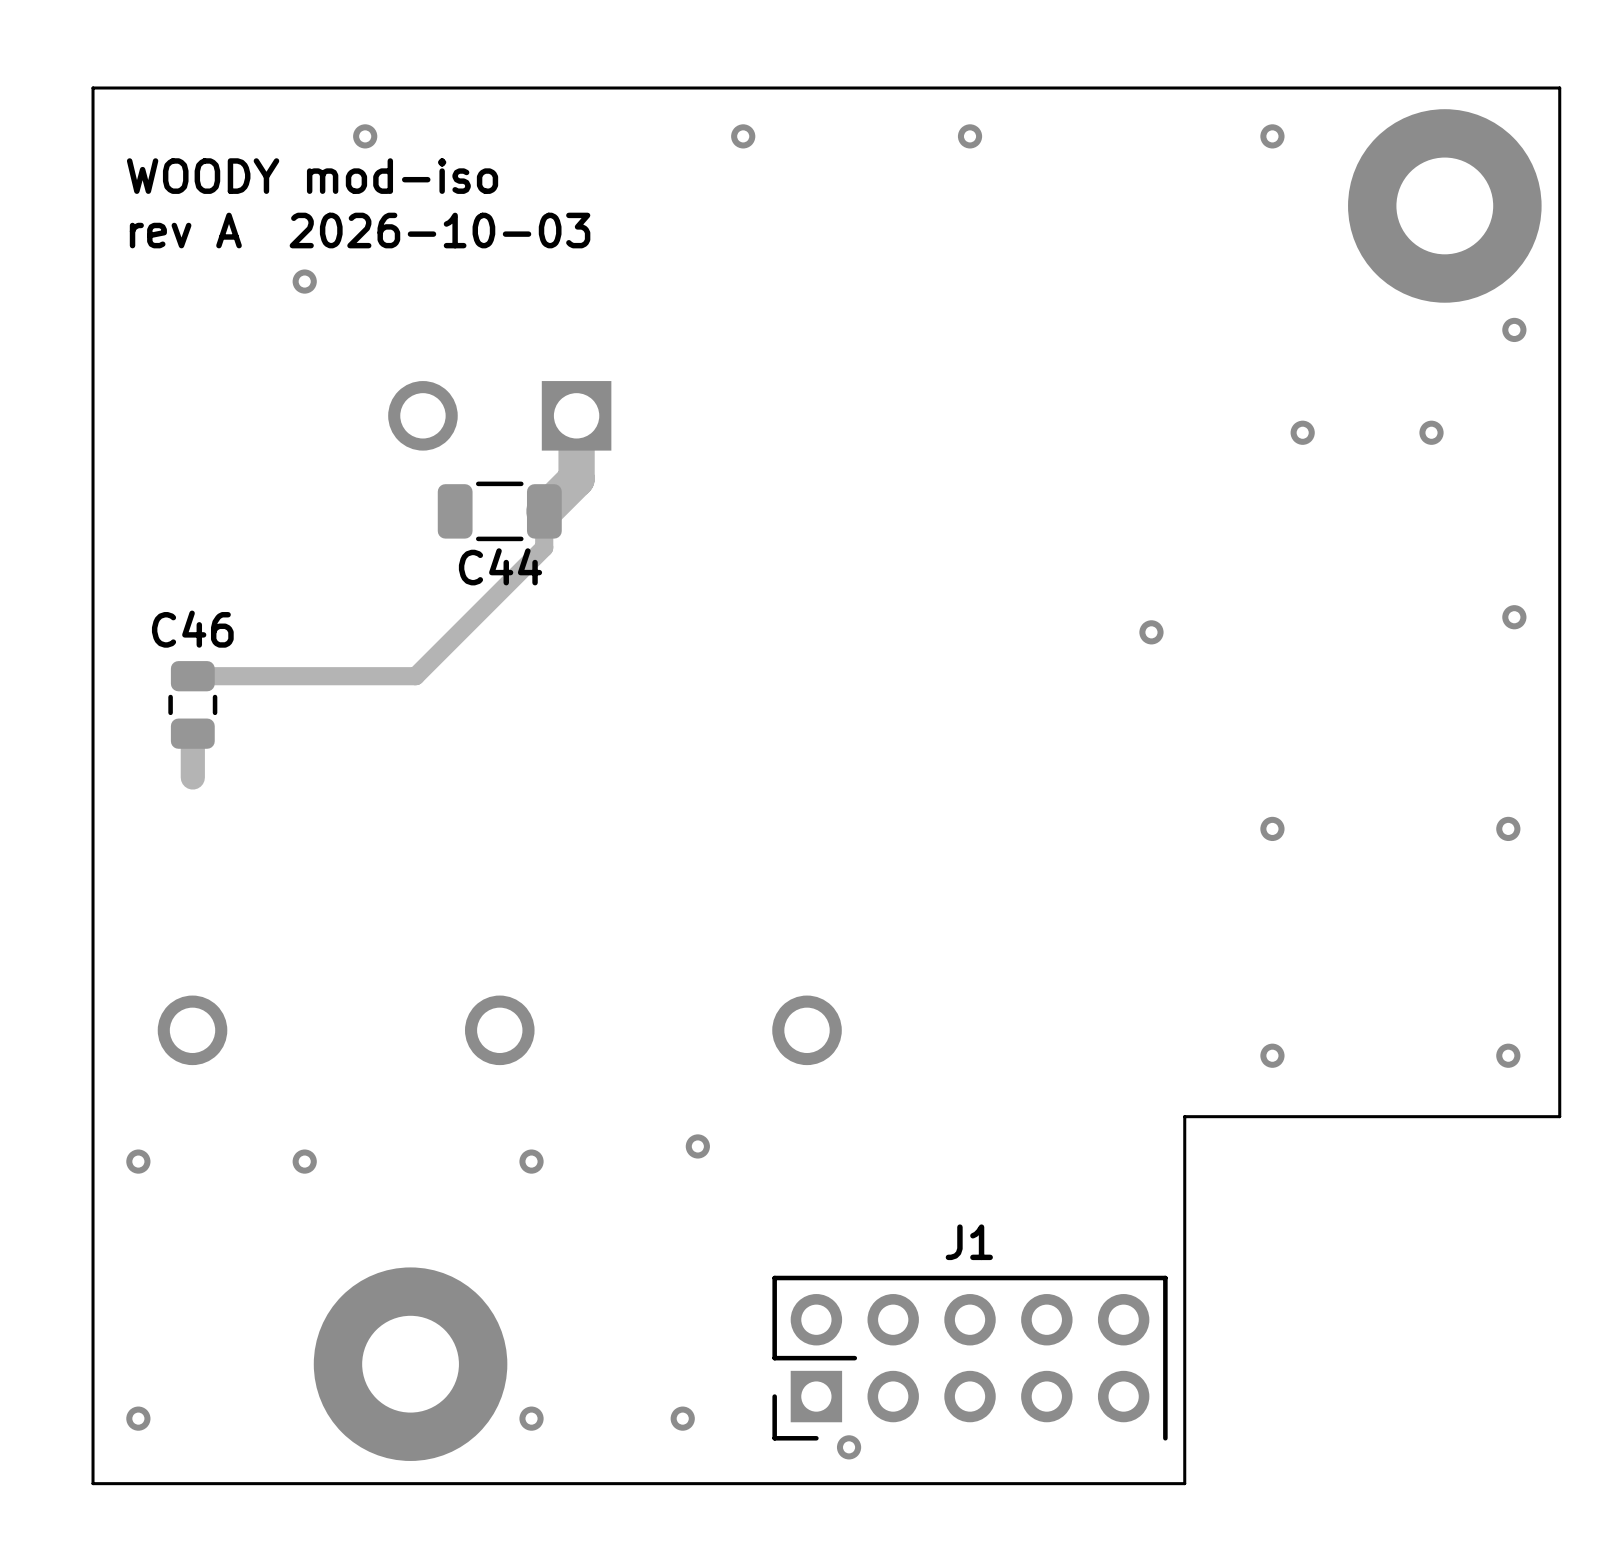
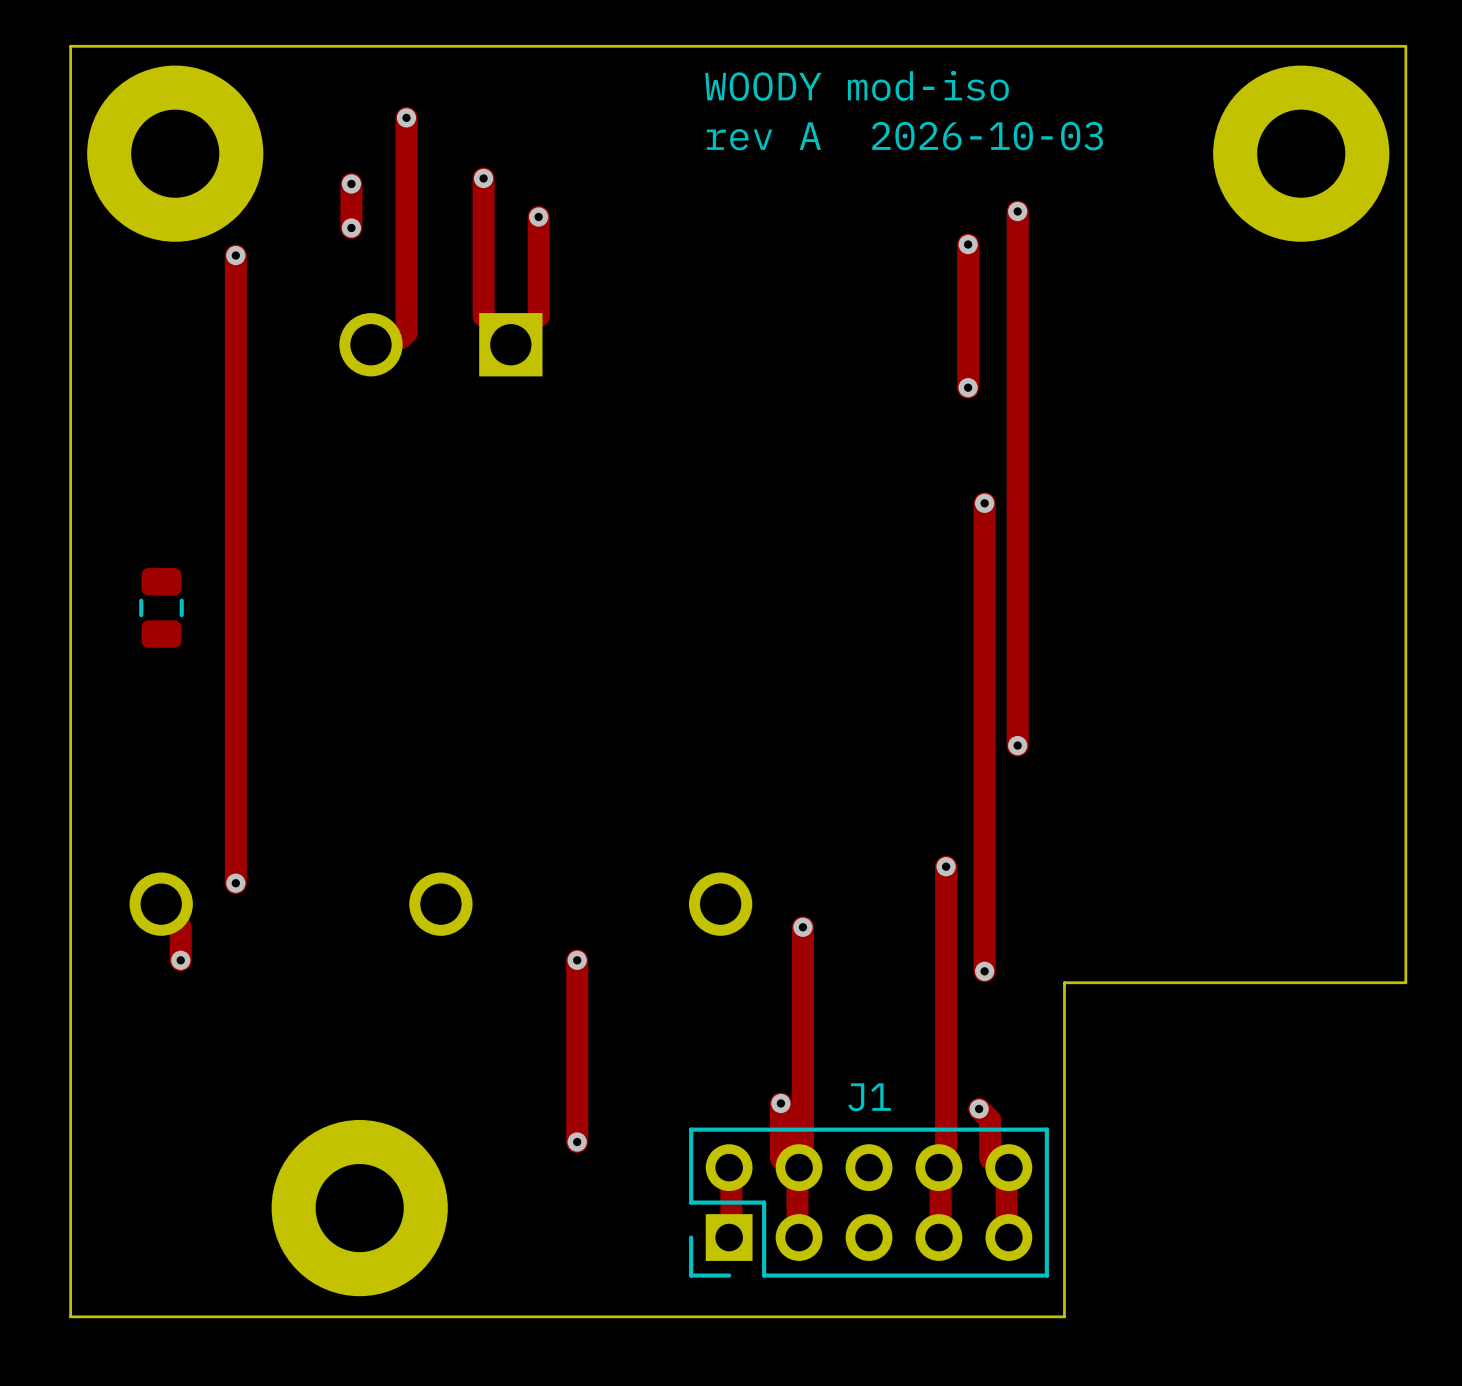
via: (365, 136) -> none
via: (743, 136) -> none
via: (970, 136) -> none
via: (1272, 136) -> none
track: none -> (406, 117) (406, 332) (401, 338)
via: none -> (406, 117)
text position: WOODY mod-iso (312, 176) -> WOODY mod-iso (857, 85)
part: none -> (175, 153)
text position: rev A 2026-10-03 (360, 230) -> rev A 2026-10-03 (904, 136)
track: none -> (483, 178) (483, 316)
via: none -> (483, 178)
track: none -> (351, 183) (351, 228)
via: none -> (351, 183)
track: none -> (1017, 211) (1017, 745)
via: none -> (1017, 211)
track: none -> (538, 217) (538, 316)
via: none -> (538, 217)
via: (304, 281) -> none
via: none -> (351, 228)
track: none -> (968, 244) (968, 387)
via: none -> (968, 244)
track: none -> (235, 255) (235, 883)
via: none -> (235, 255)
via: (1514, 329) -> none
track: (576, 415) (576, 479) (544, 511) (544, 547) (415, 676) (192, 676) -> none
via: (1302, 432) -> none
via: (1431, 432) -> none
via: none -> (968, 387)
part: (499, 511) -> none
text: C44 (500, 566) -> none
track: none -> (984, 503) (984, 971)
via: none -> (984, 503)
via: (1514, 617) -> none
text: C46 (192, 629) -> none
via: (1151, 632) -> none
track: (192, 733) (192, 777) -> none
via: (1272, 828) -> none
via: (1508, 828) -> none
via: none -> (1017, 745)
track: none -> (946, 866) (946, 1147)
via: none -> (946, 866)
via: none -> (235, 883)
track: none -> (180, 927) (180, 960)
track: none -> (802, 927) (802, 1147)
via: none -> (802, 927)
via: (1272, 1055) -> none
via: (1508, 1055) -> none
via: none -> (180, 960)
track: none -> (577, 960) (577, 1142)
via: none -> (577, 960)
via: none -> (984, 971)
via: (697, 1146) -> none
via: (138, 1161) -> none
via: (304, 1161) -> none
via: (531, 1161) -> none
track: none -> (780, 1103) (780, 1158)
via: none -> (780, 1103)
track: none -> (979, 1108) (990, 1119) (990, 1158)
via: none -> (979, 1108)
part footprint: [772, 1275, 1168, 1441] -> [689, 1127, 1049, 1278]
via: none -> (577, 1142)
track: none -> (731, 1186) (731, 1219)
track: none -> (797, 1186) (797, 1219)
track: none -> (940, 1186) (940, 1219)
track: none -> (1006, 1186) (1006, 1219)
via: (138, 1418) -> none
via: (531, 1418) -> none
via: (682, 1418) -> none
via: (849, 1447) -> none

